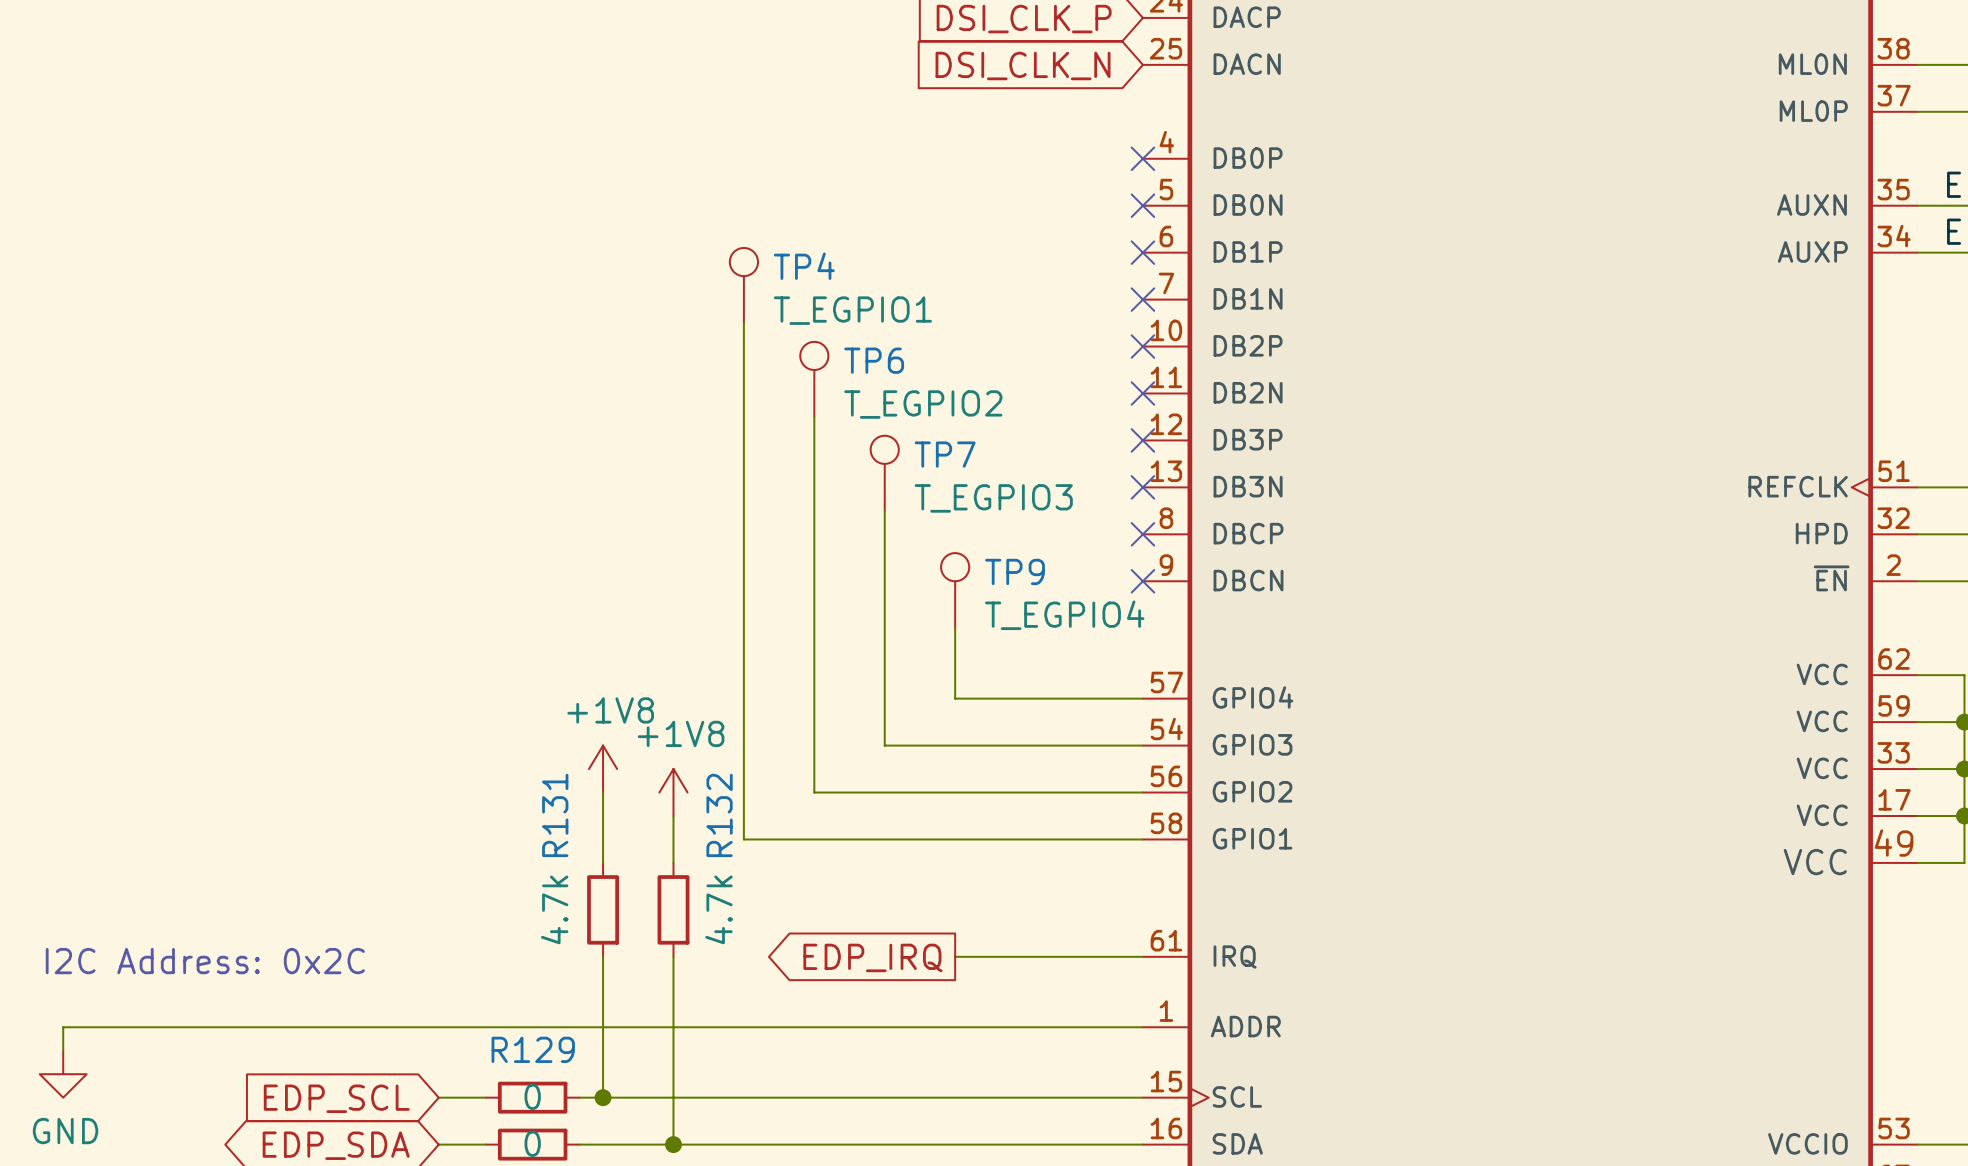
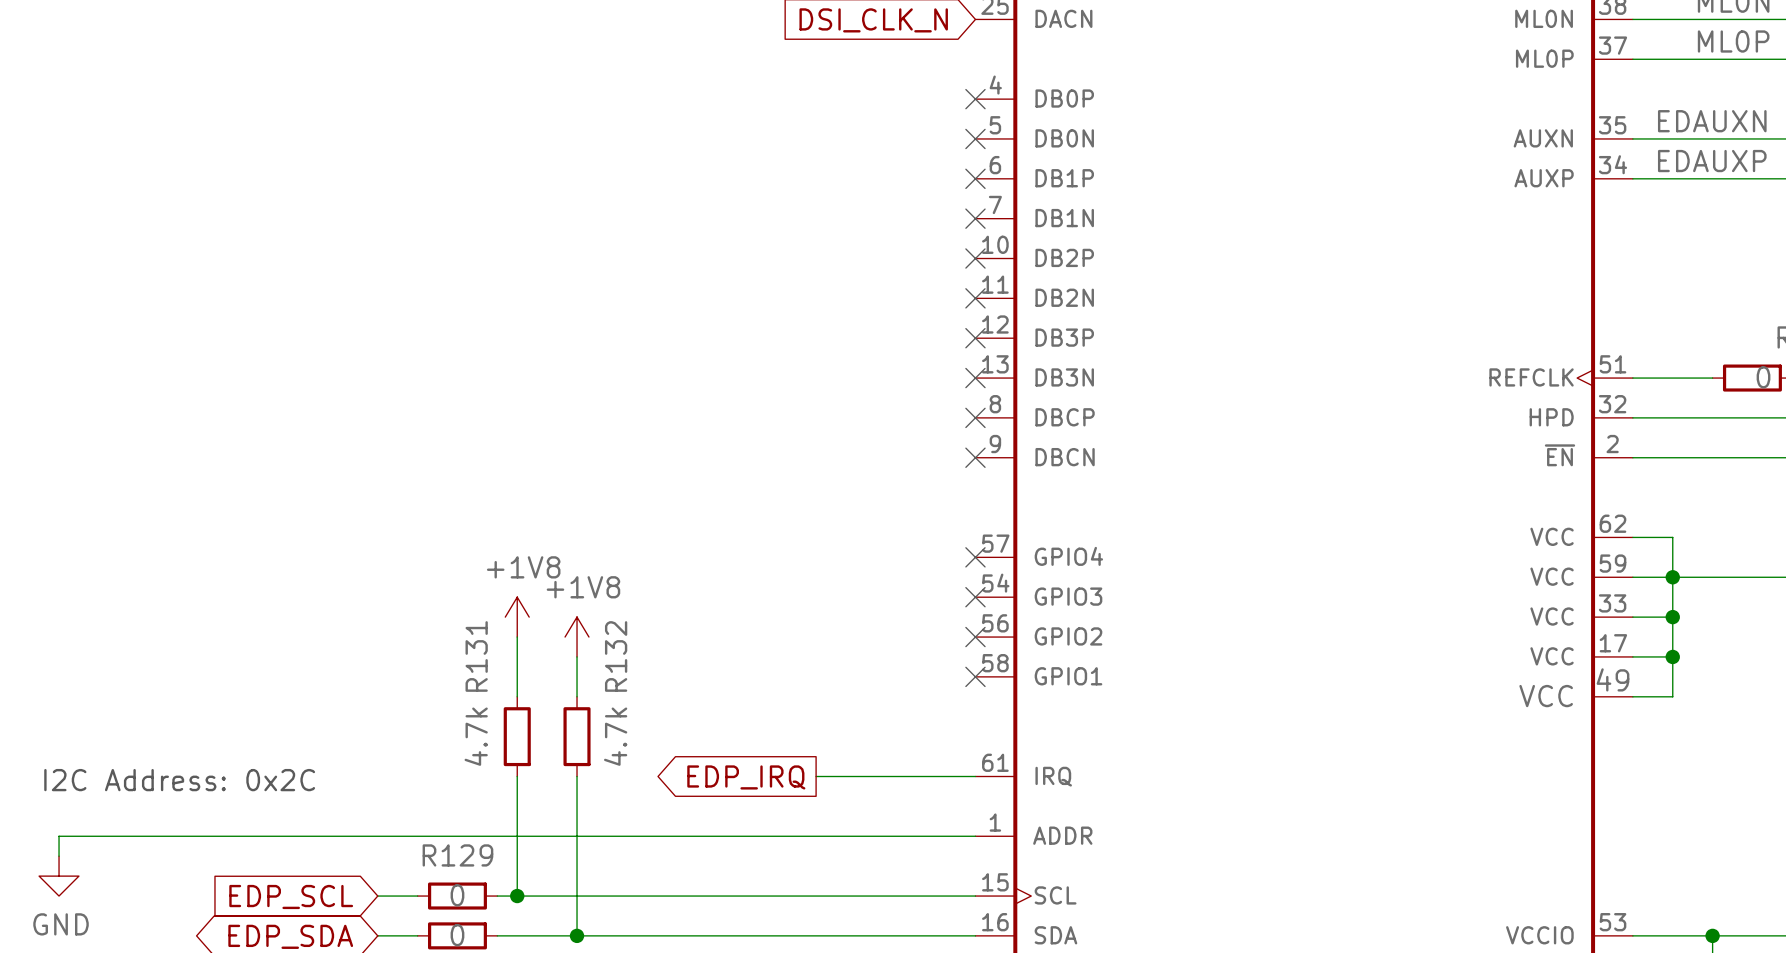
TP4: T_EGPIO1 (743, 285) -> none
wire: (743, 323) (743, 839) (1142, 839) -> none
TP6: T_EGPIO2 (814, 379) -> none
wire: (814, 416) (814, 792) (1142, 792) -> none
TP7: T_EGPIO3 (884, 473) -> none
wire: (884, 510) (884, 745) (1142, 745) -> none
TP9: T_EGPIO4 (955, 590) -> none
wire: (955, 628) (955, 698) (1142, 698) -> none
no-connect mark: none -> (975, 557)
no-connect mark: none -> (975, 597)
no-connect mark: none -> (975, 637)
no-connect mark: none -> (975, 676)

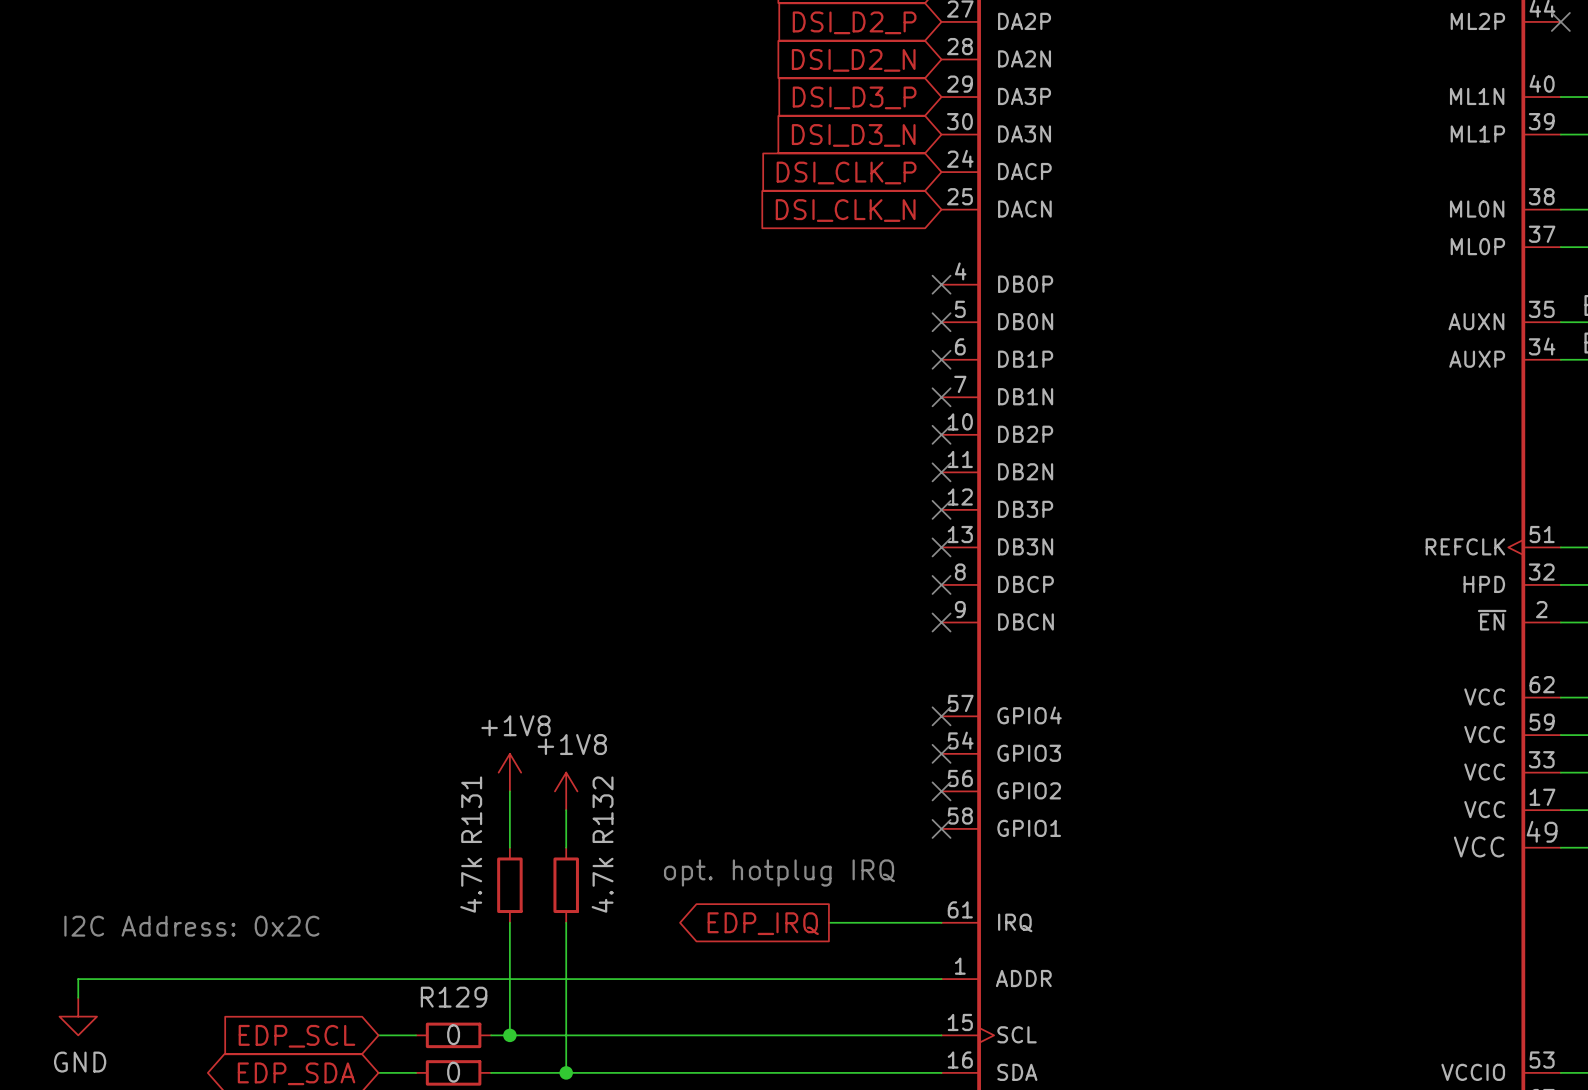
text: none -> opt. hotplug IRQ (779, 872)
wire: (816, 776) (855, 776) -> none
global label position: EDP_IRQ (746, 777) -> EDP_IRQ (763, 923)

